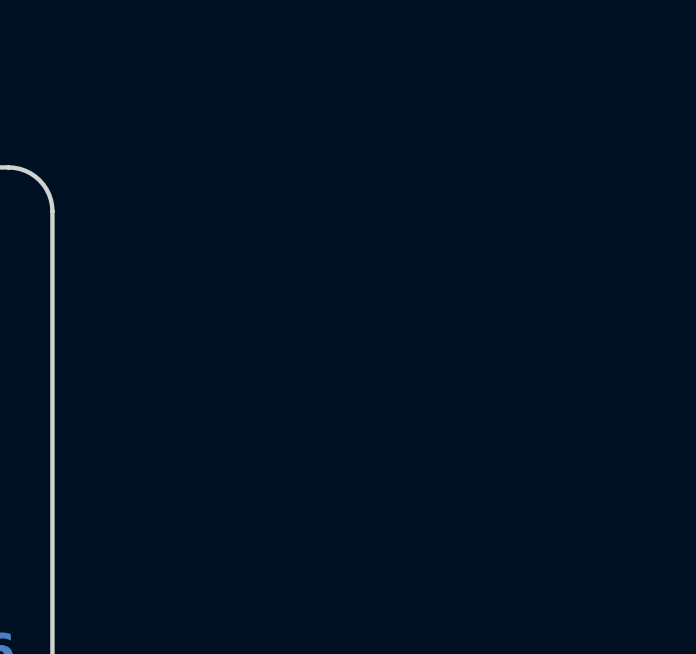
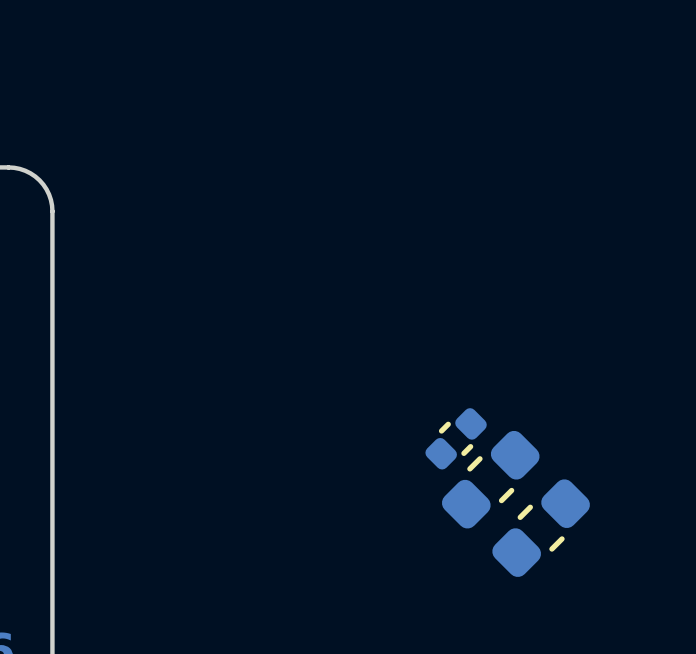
part: none -> (456, 438)
part: none -> (490, 479)
part: none -> (541, 528)

